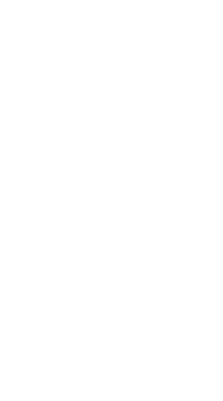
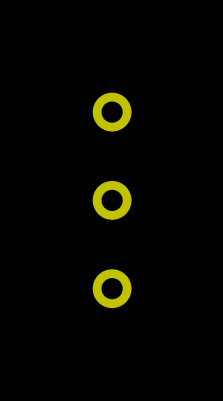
part: none -> (112, 200)

